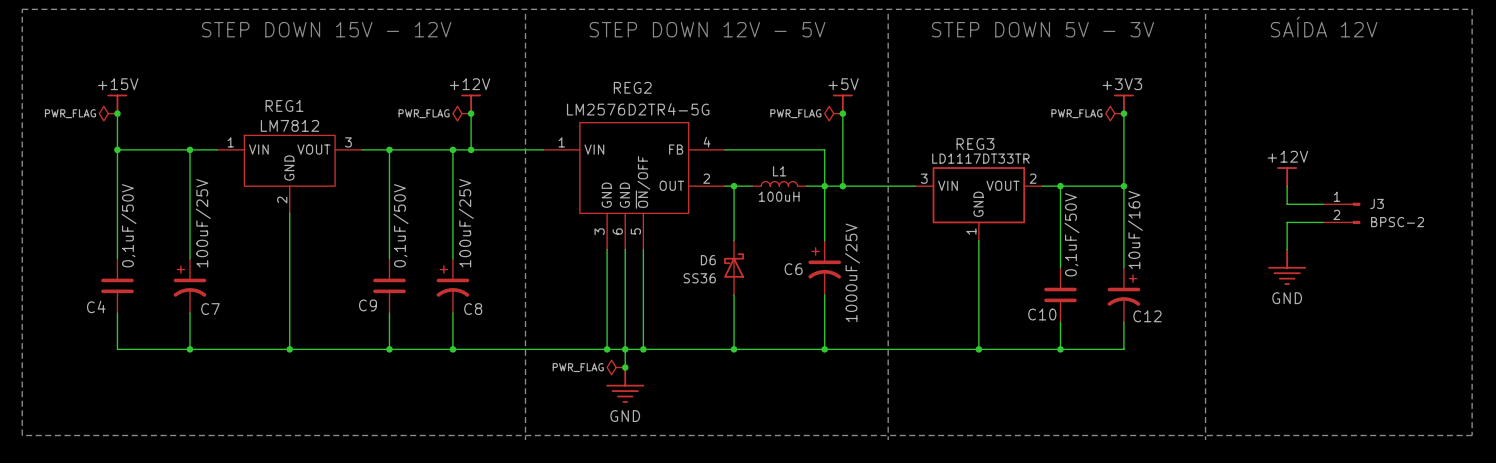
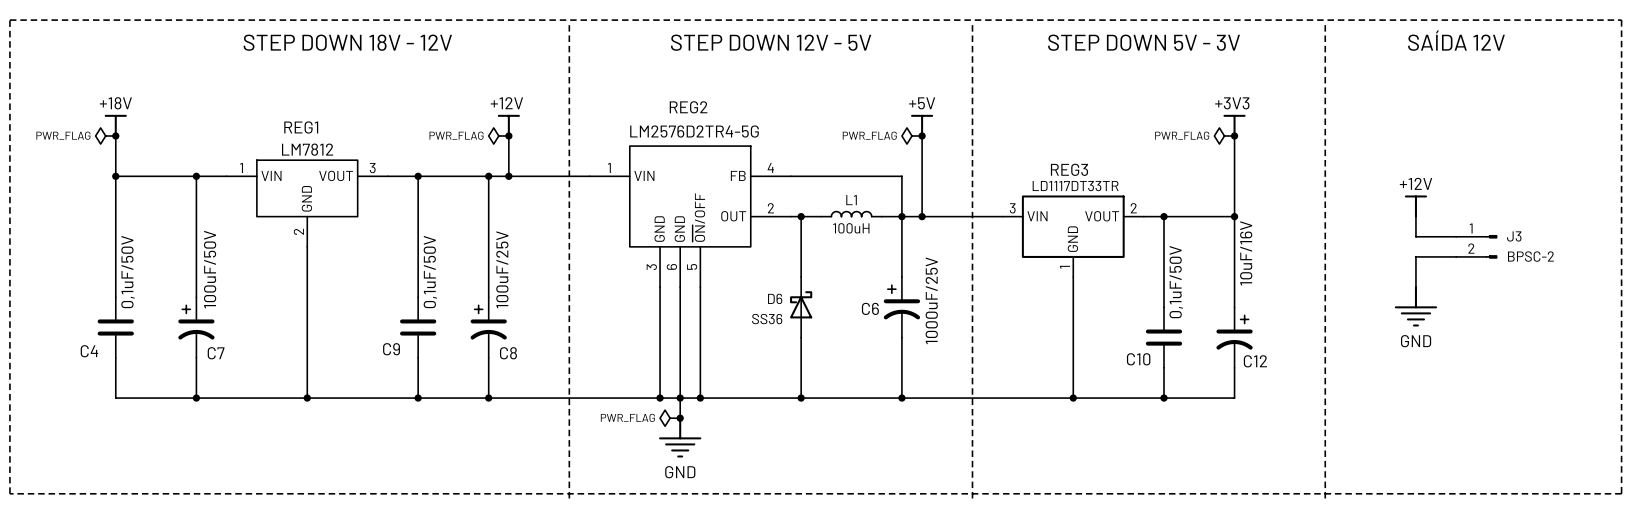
text: STEP DOWN 15V - 12V (326, 29) -> STEP DOWN 18V - 12V (347, 42)
power symbol: +15V (117, 104) -> +18V (115, 125)
C7 value: 100uF/25V (203, 223) -> 100uF/50V (210, 269)

